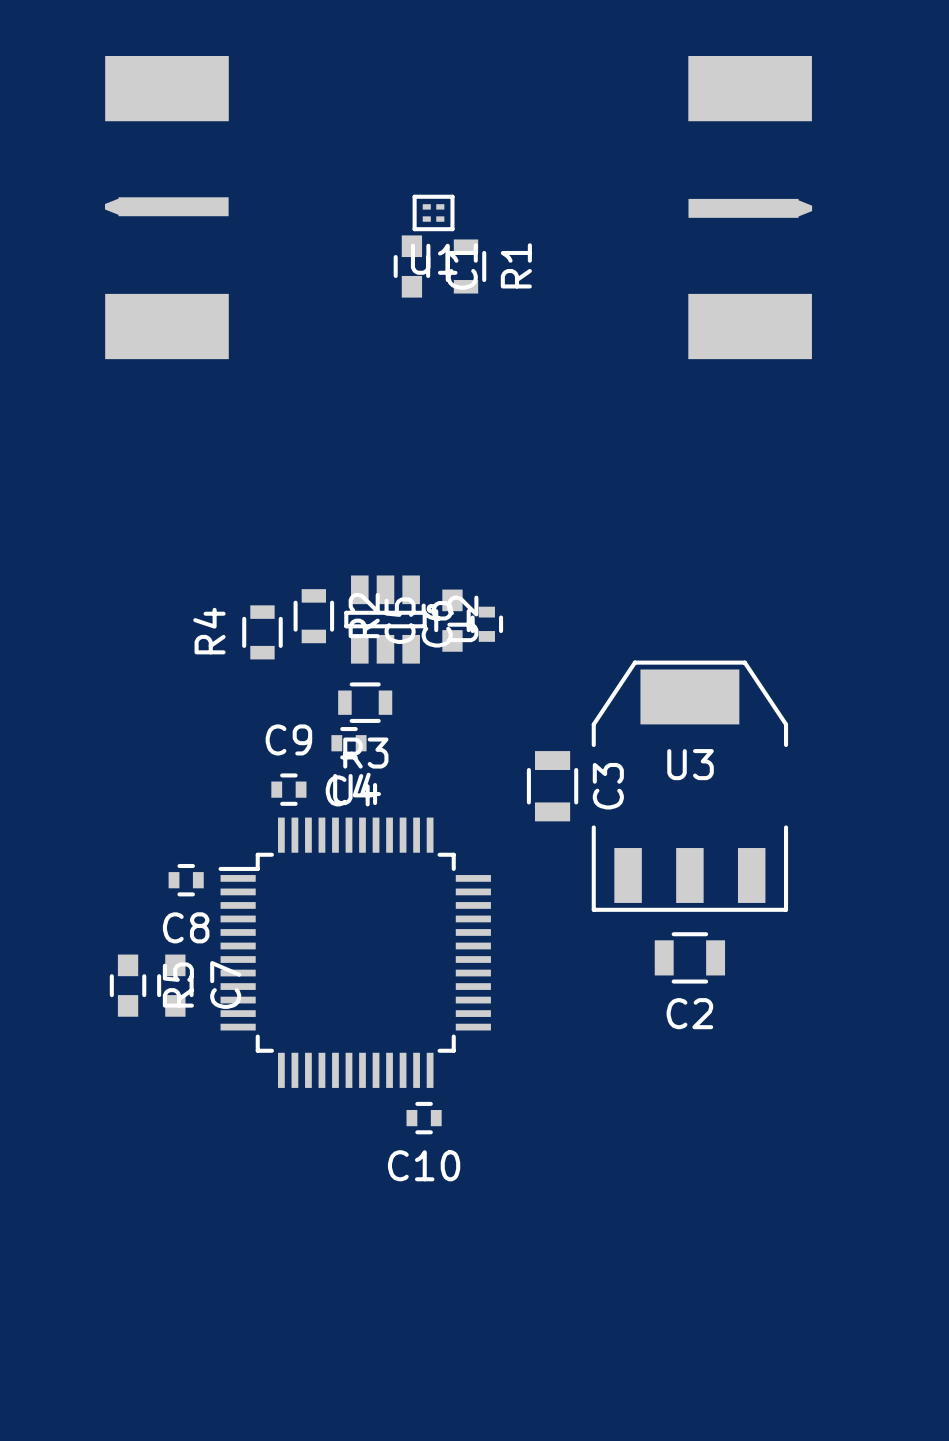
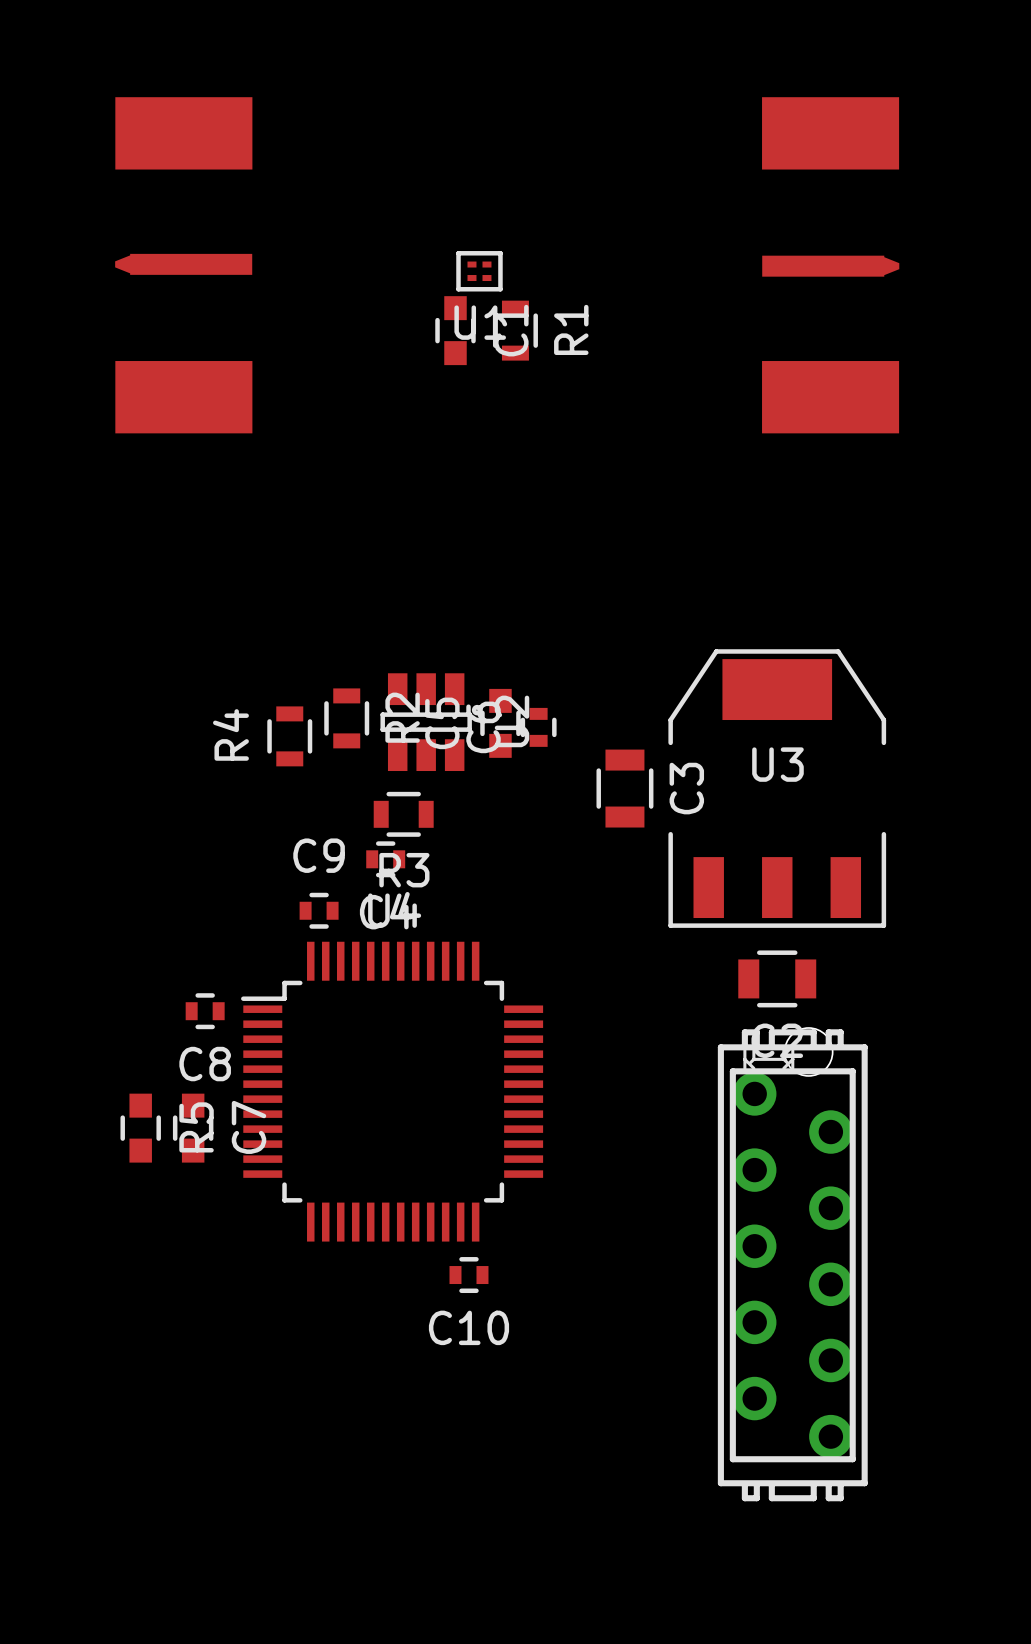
C3 position: (552, 786) -> (624, 788)
U3 position: (689, 786) -> (777, 788)
C2 position: (689, 957) -> (777, 978)
part: none -> (792, 1264)

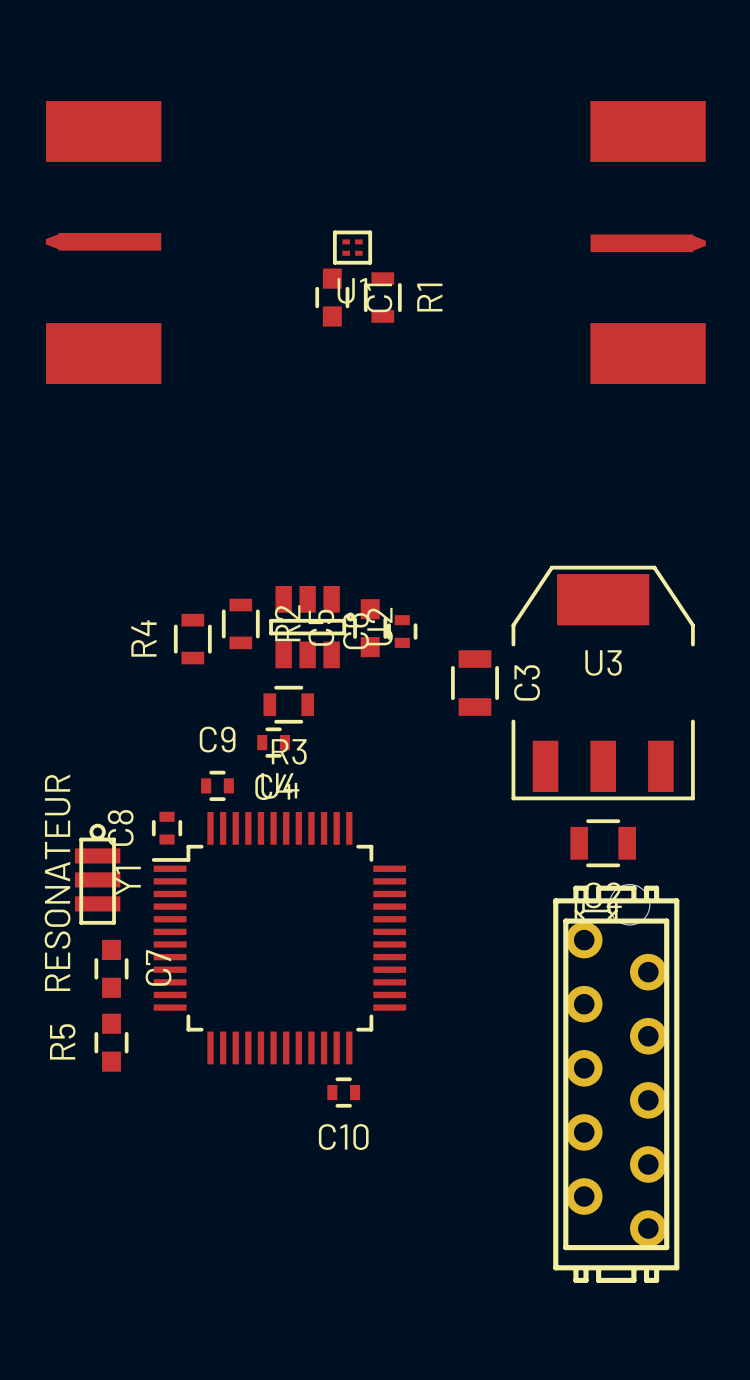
C8 rotation: 0° (205, 1011) -> 90° clockwise (167, 828)
C8 position: (205, 1011) -> (167, 828)
Y1: none -> RESONATEUR (97, 874)
R5 name position: R5 (196, 1127) -> R5 (62, 1041)
R5 position: (140, 1128) -> (111, 1042)

